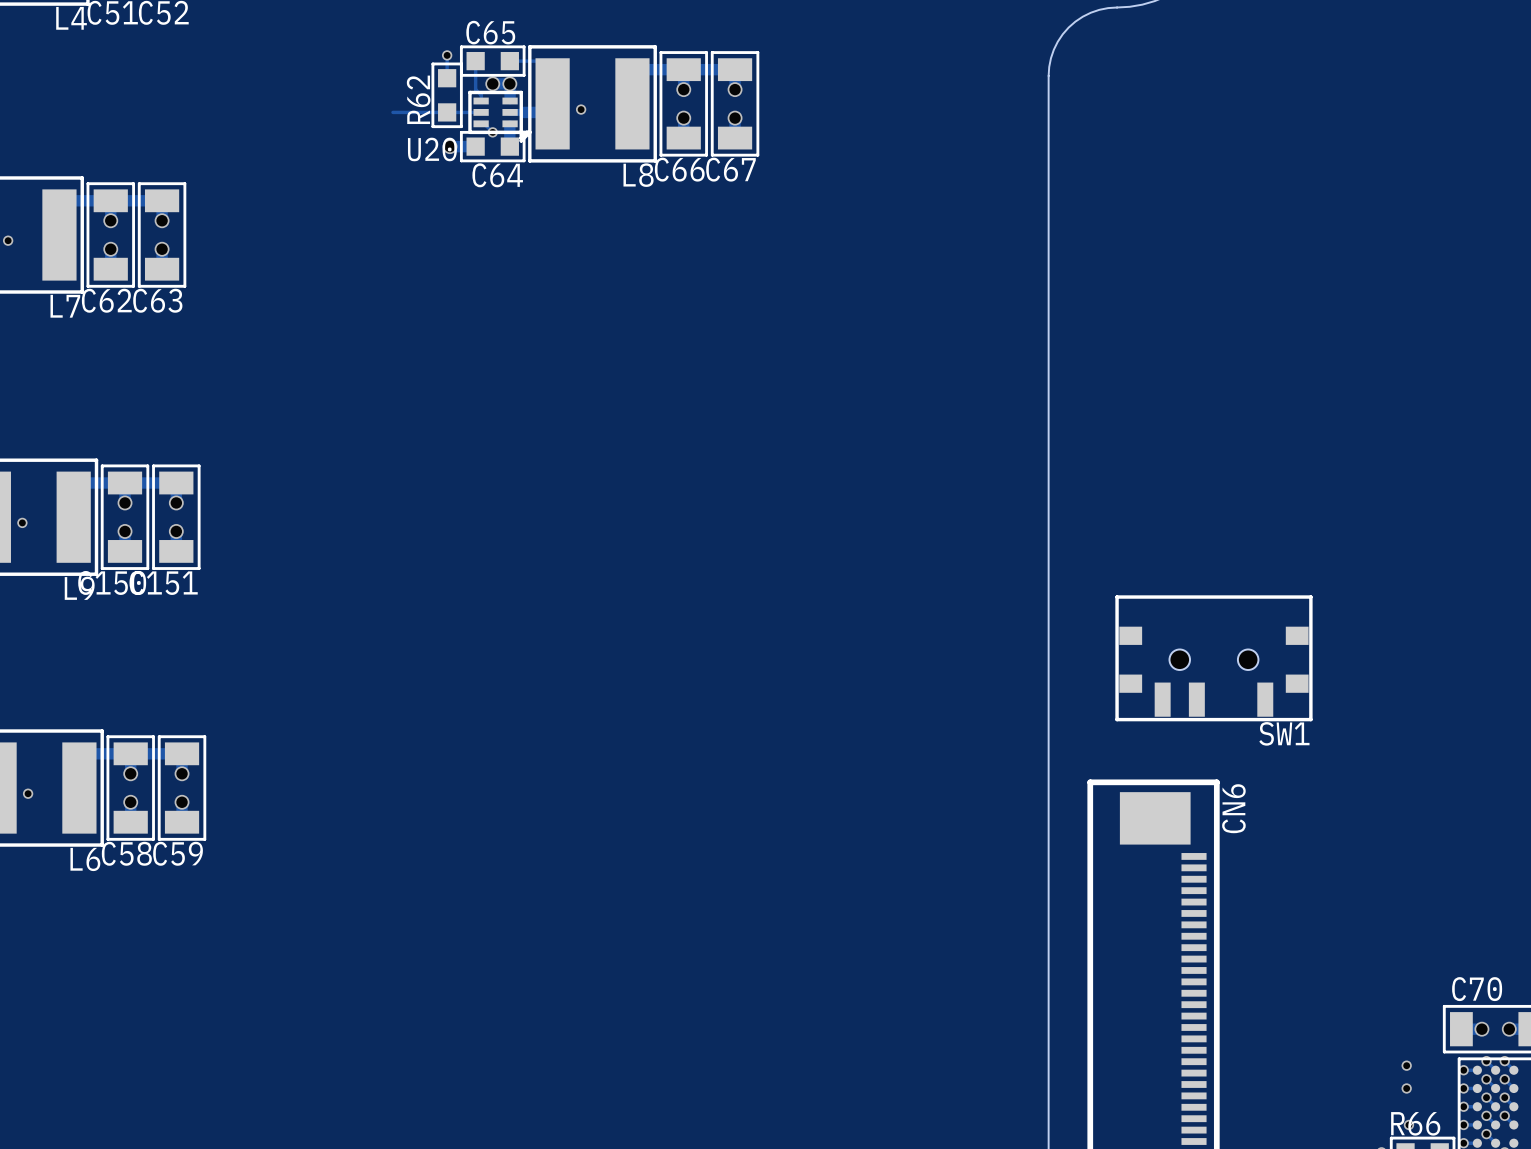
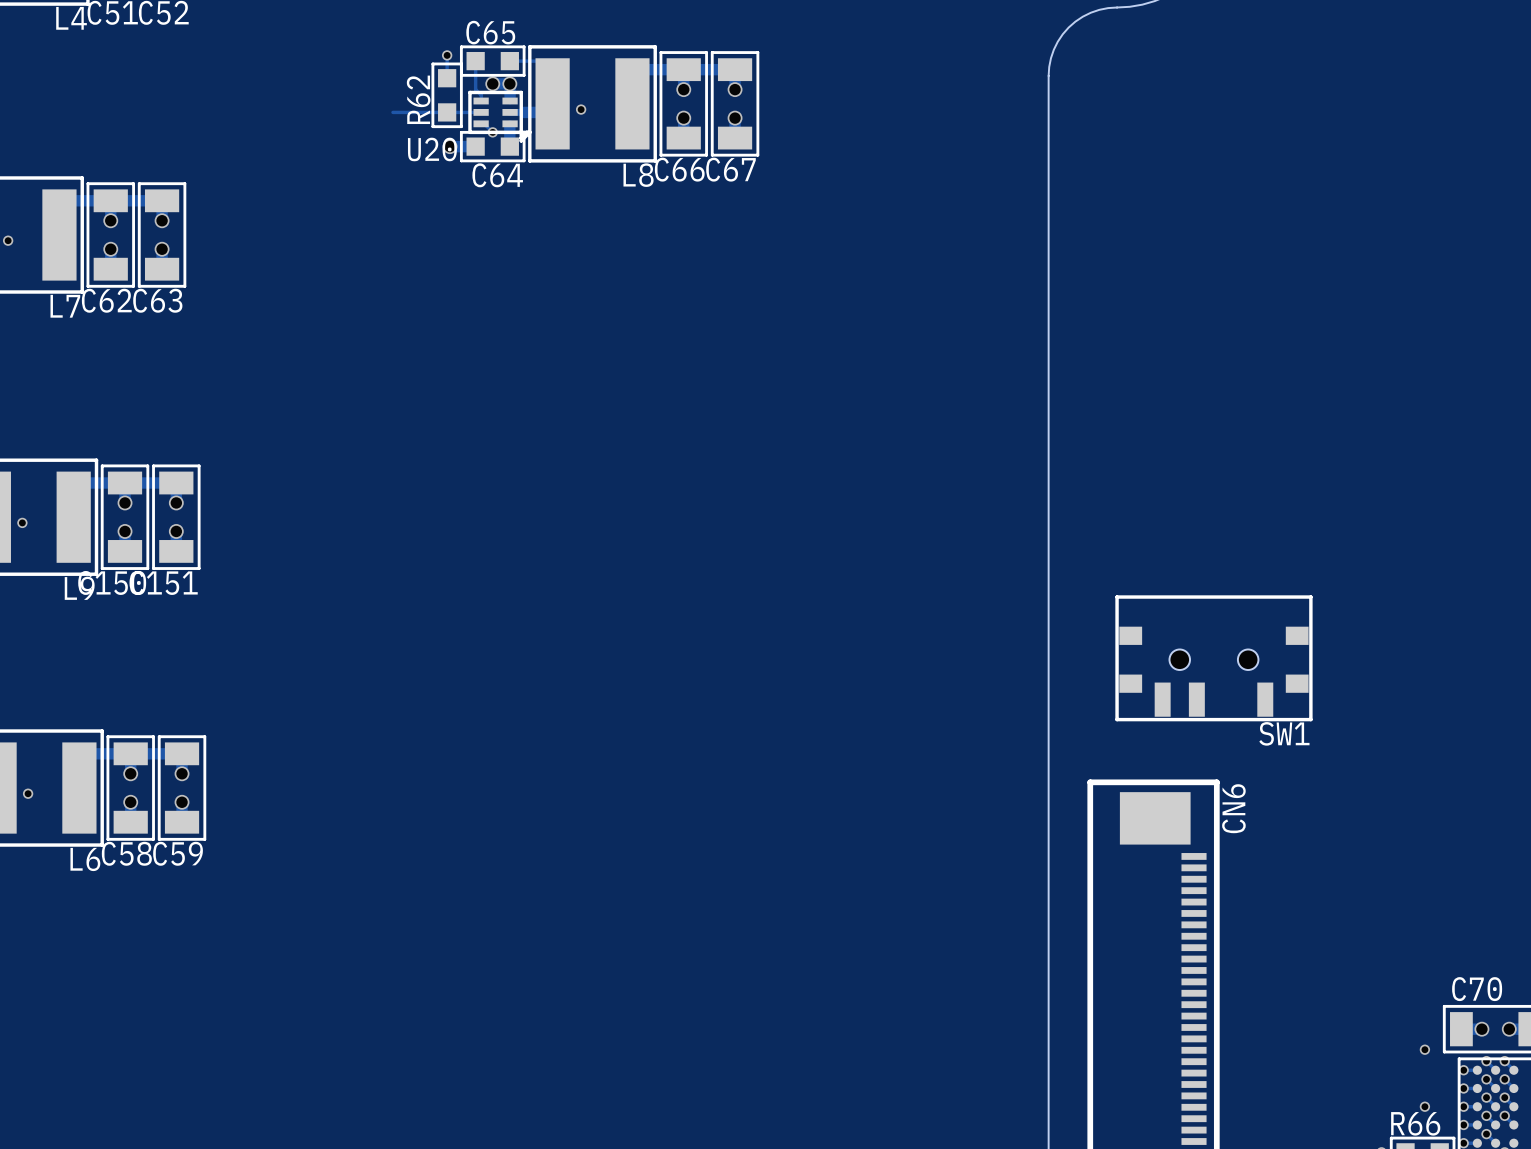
via: none -> (1424, 1049)
via: (1406, 1065) -> none
via: (1406, 1088) -> none
via: none -> (1424, 1106)
via: (1408, 1124) -> none

